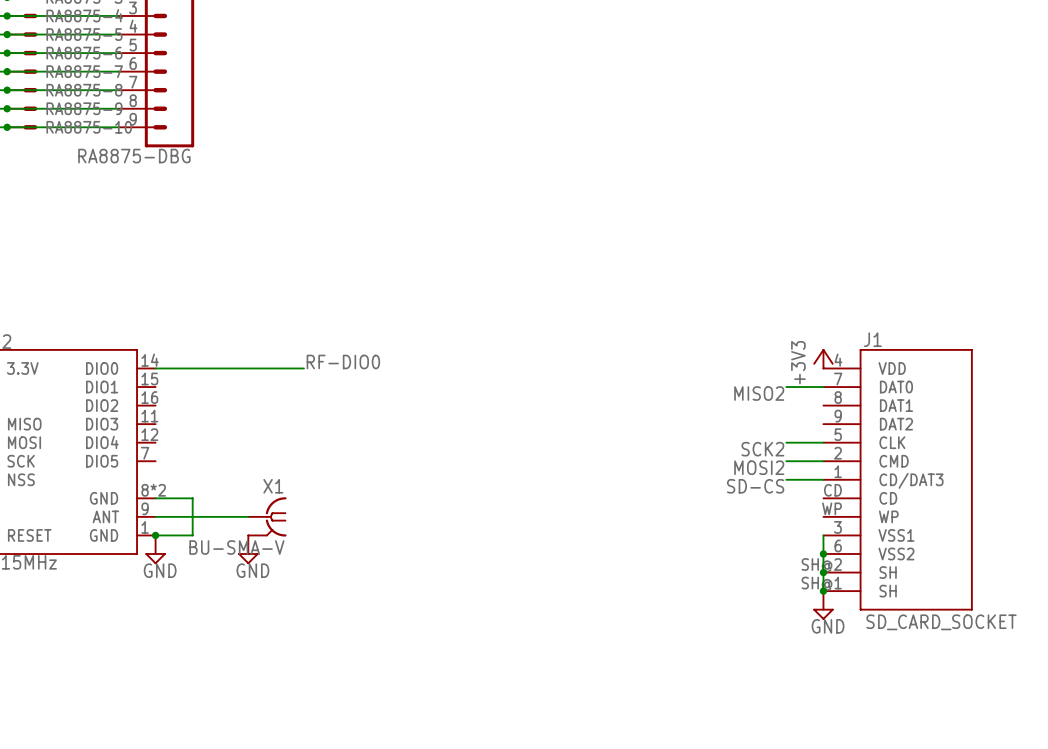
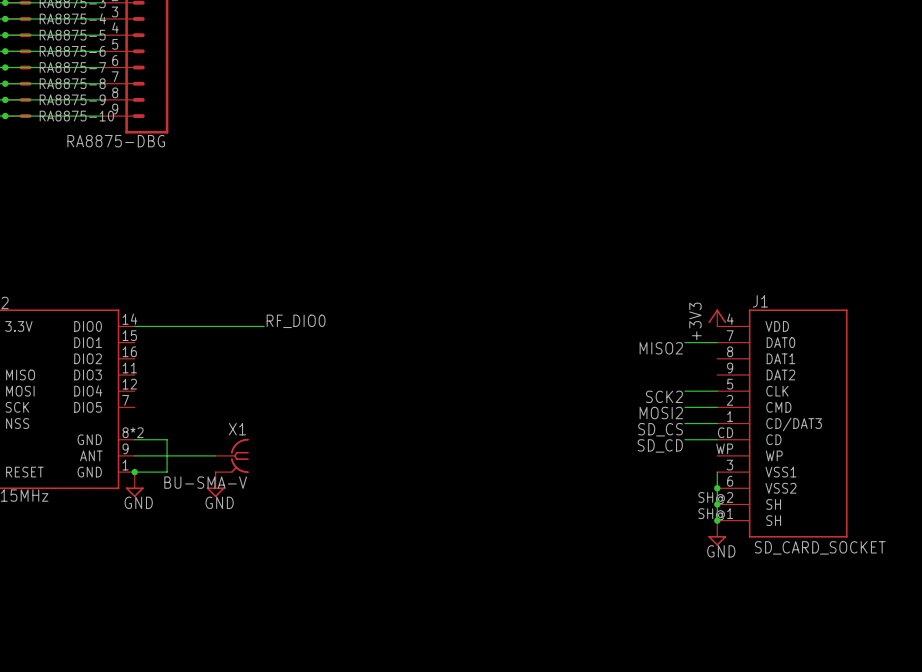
label: RF-DIO0 (343, 361) -> RF_DIO0 (296, 321)
label: SD-CS (755, 486) -> SD_CS (660, 429)
wire: none -> (684, 439) (717, 439)
label: none -> SD_CD (660, 445)

